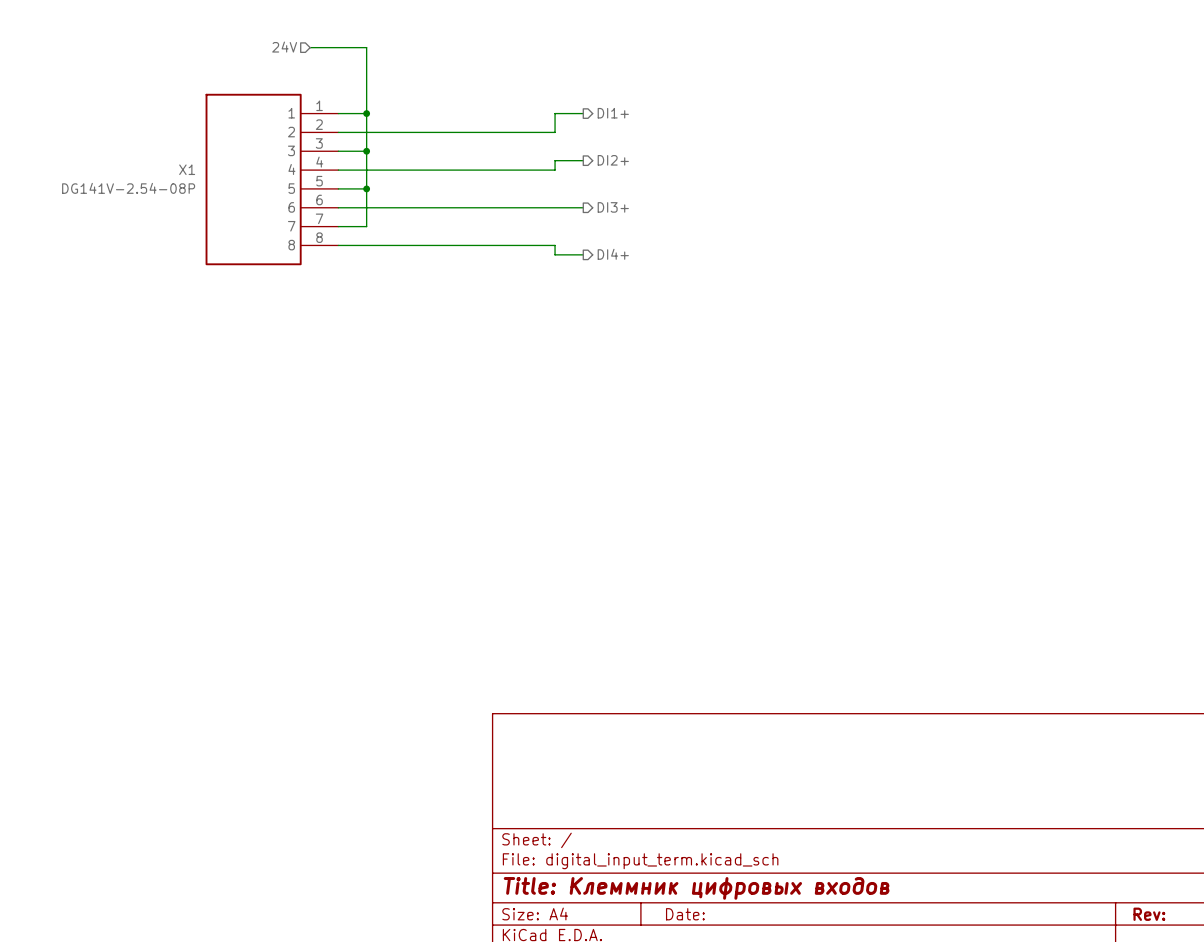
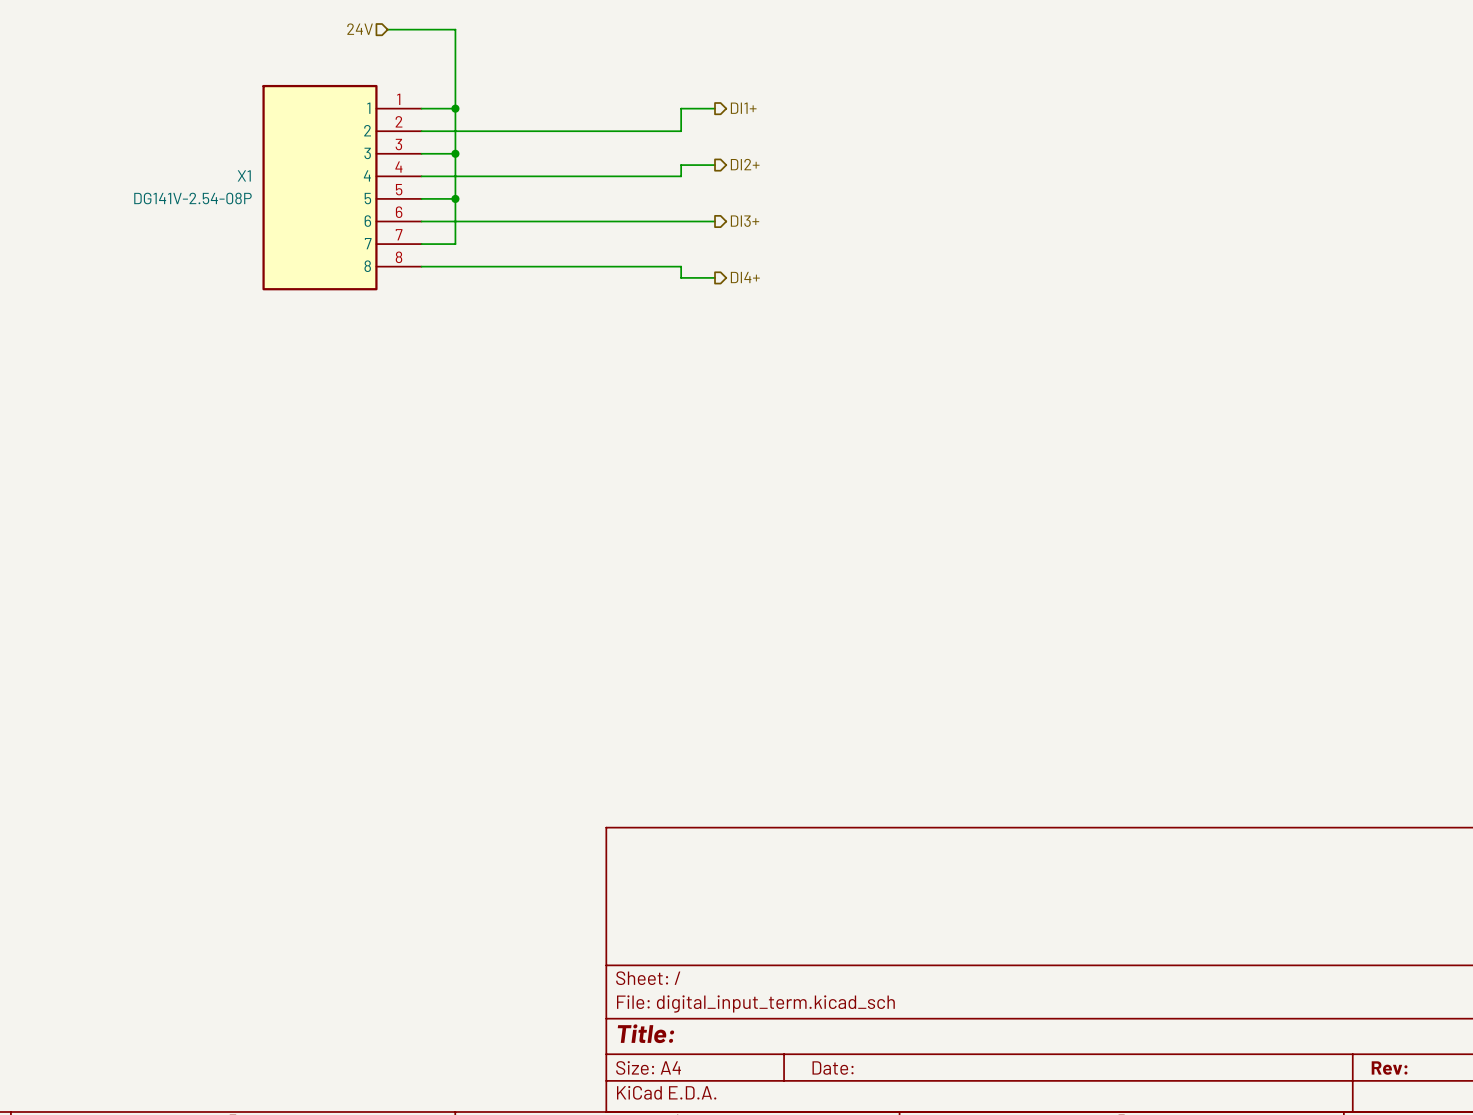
title block: Title: Клеммник цифровых входов (696, 888) -> Title: (645, 1033)

